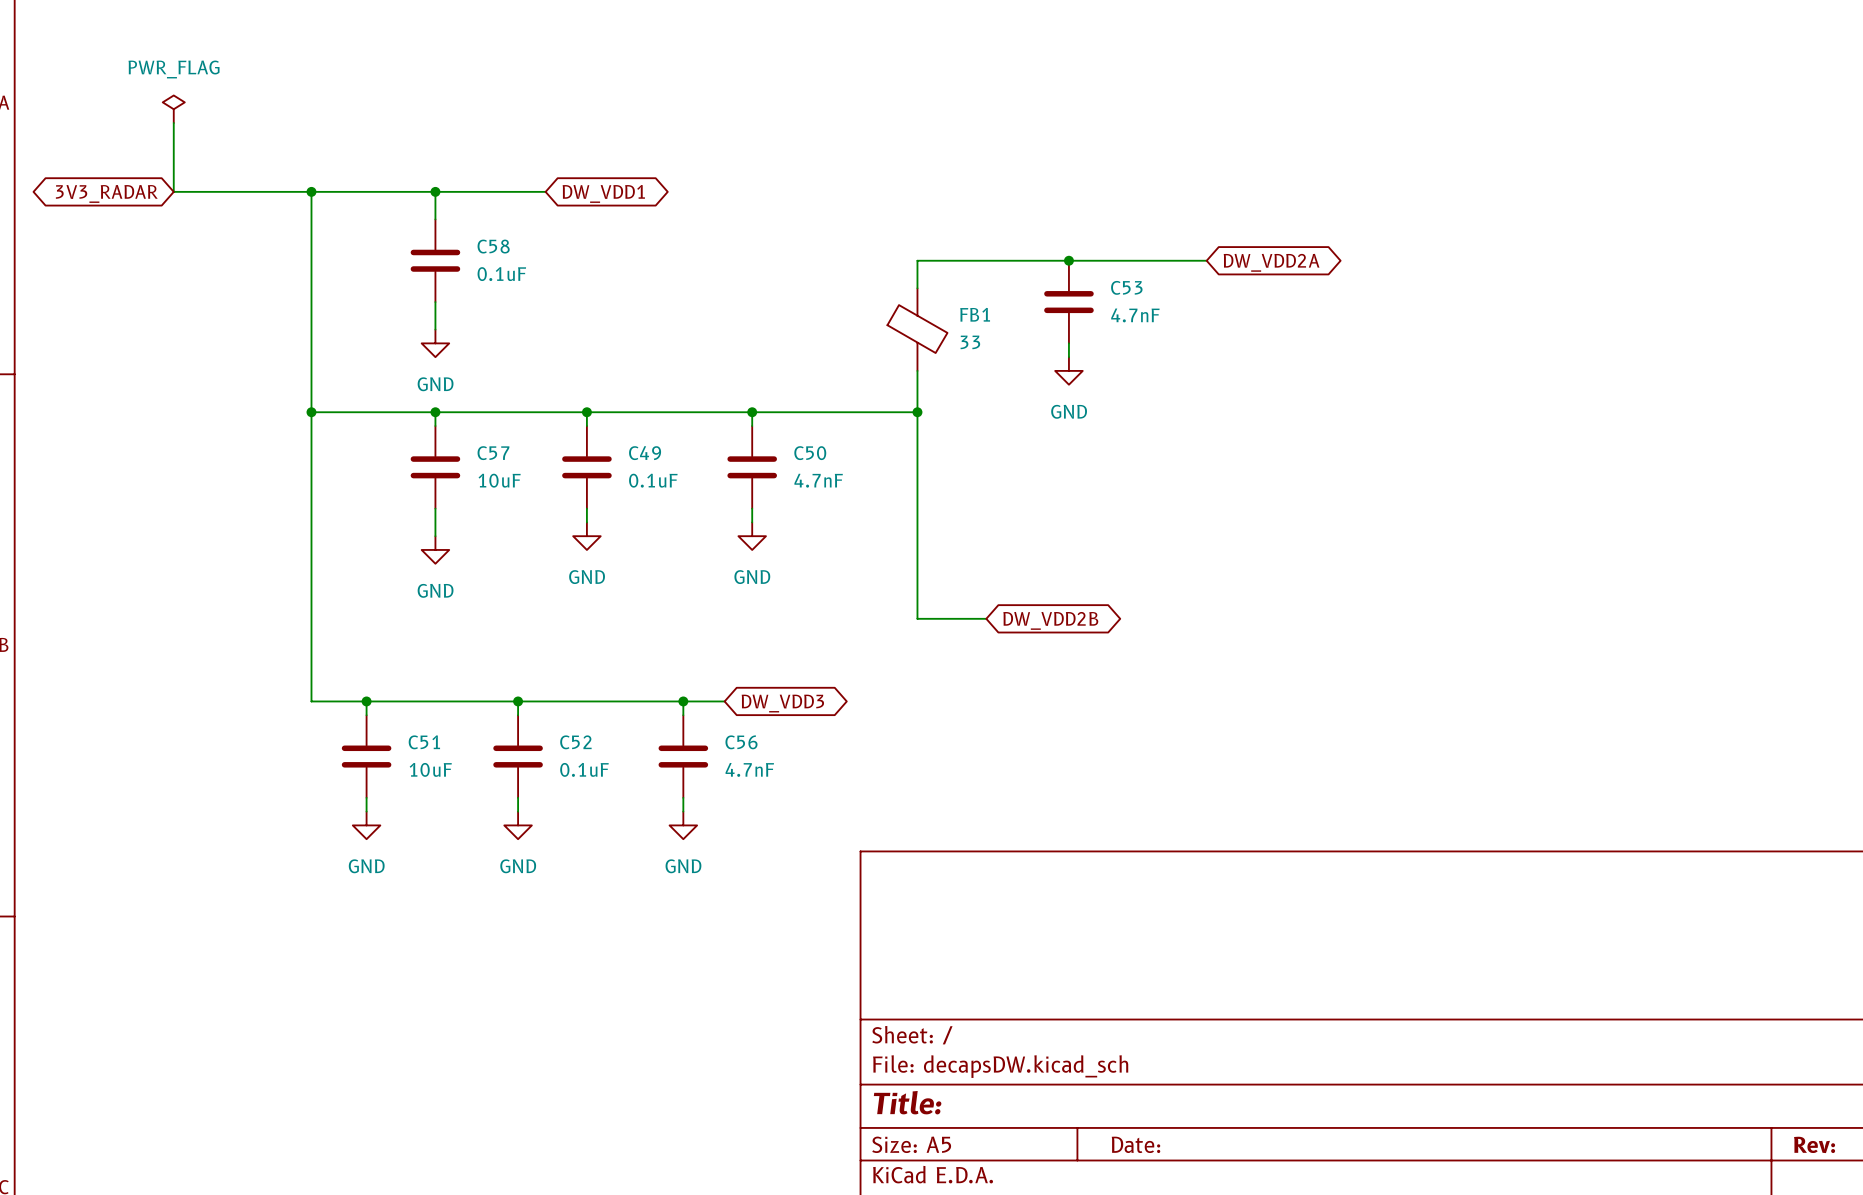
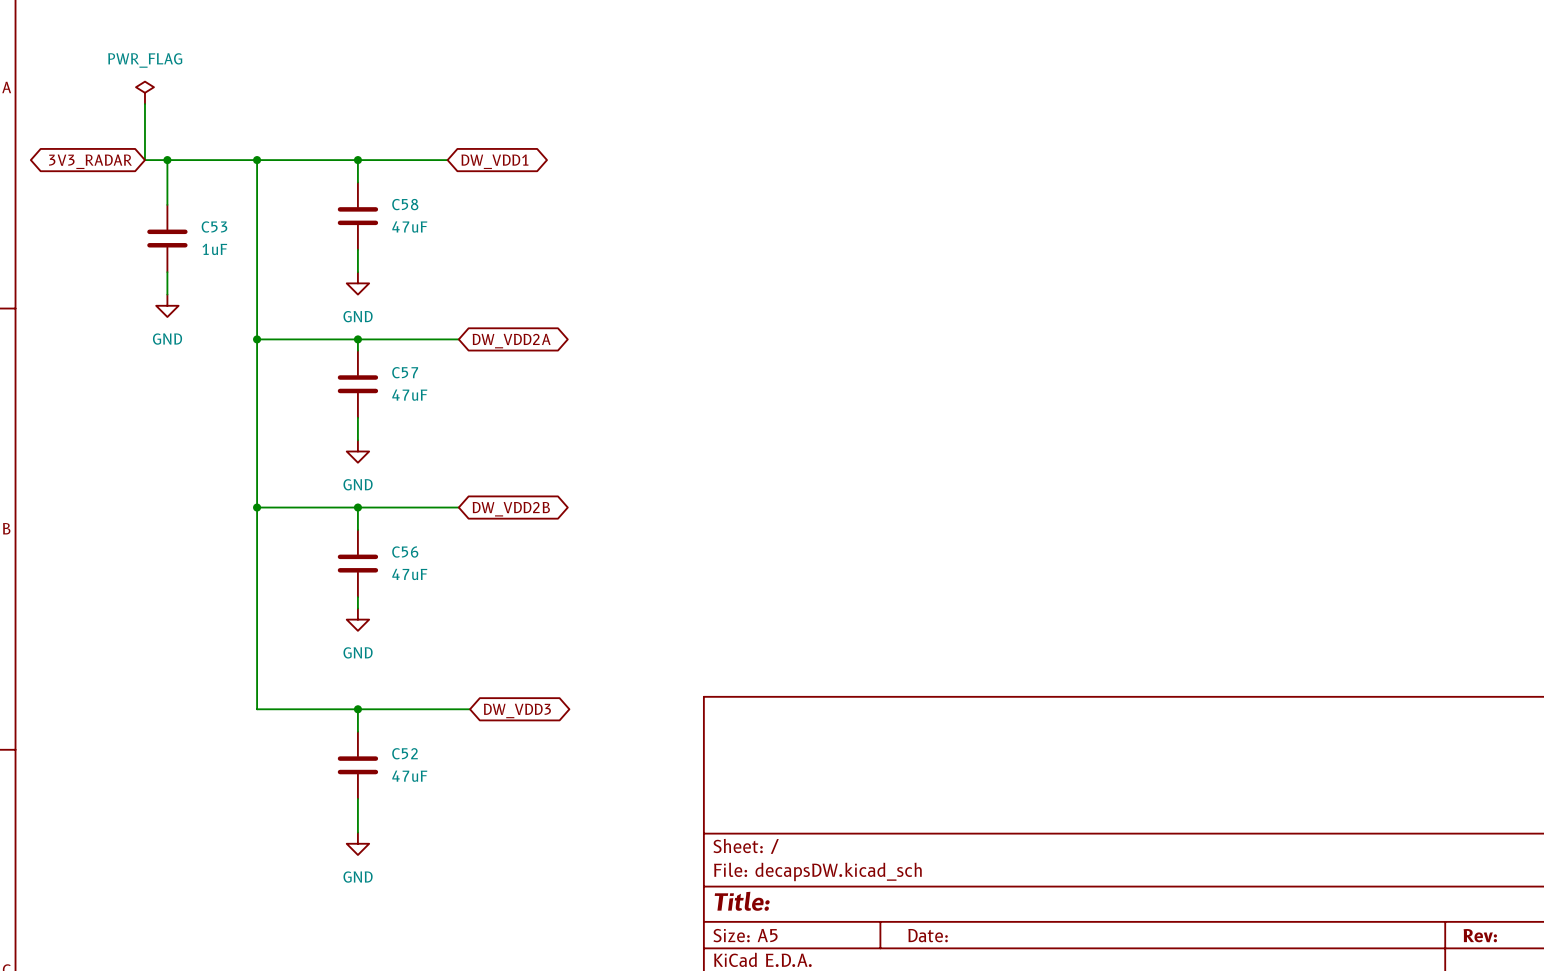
wire: none -> (167, 160) (167, 204)
junction: none -> (167, 160)
junction: (1068, 260) -> none
wire: (1206, 260) (917, 260) (917, 288) -> none
global label: DW_VDD2A (1271, 262) -> none
C58 value: 0.1uF (501, 274) -> 47uF (409, 226)
C53 position: (1068, 302) -> (167, 238)
C53 value: 4.7nF (1135, 315) -> 1uF (214, 249)
wire: none -> (167, 272) (167, 294)
FB1: 33 (917, 329) -> none
wire: (1068, 343) (1068, 357) -> none
power symbol: none -> GND (167, 305)
wire: (917, 370) (917, 618) (986, 618) -> none
power symbol: GND (1068, 370) -> none
wire: (559, 412) (917, 412) -> none
wire: (586, 412) (586, 426) -> none
junction: (586, 412) -> none
wire: (752, 412) (752, 426) -> none
junction: (752, 412) -> none
junction: (917, 412) -> none
global label: none -> DW_VDD2A (511, 341)
C49: 0.1uF (586, 467) -> none
C50: 4.7nF (752, 467) -> none
C57 value: 10uF (499, 480) -> 47uF (409, 395)
wire: (586, 508) (586, 522) -> none
wire: (752, 508) (752, 522) -> none
power symbol: GND (586, 536) -> none
power symbol: GND (752, 536) -> none
wire: none -> (257, 507) (458, 507)
junction: none -> (257, 507)
wire: none -> (357, 507) (357, 529)
junction: none -> (357, 507)
global label: none -> DW_VDD2B (511, 509)
global label: DW_VDD2B (1050, 620) -> none
wire: (311, 701) (724, 701) -> (257, 574) (257, 709) (470, 709)
wire: (366, 701) (366, 715) -> (357, 597) (357, 608)
junction: (366, 701) -> none
wire: (518, 701) (518, 715) -> none
junction: (518, 701) -> none
wire: (683, 701) (683, 715) -> none
junction: (683, 701) -> none
global label position: DW_VDD3 (782, 703) -> DW_VDD3 (517, 710)
C51: 10uF (366, 756) -> none
power symbol: none -> GND (357, 619)
C52 position: (518, 756) -> (357, 765)
C56 position: (683, 756) -> (357, 563)
C52 value: 0.1uF (584, 769) -> 47uF (409, 776)
C56 value: 4.7nF (749, 769) -> 47uF (409, 574)
wire: (366, 797) (366, 811) -> none
wire: (518, 797) (518, 811) -> none
wire: (683, 797) (683, 811) -> none
power symbol: GND (366, 825) -> none
power symbol: GND (518, 825) -> none
power symbol: GND (683, 825) -> none
wire: none -> (357, 709) (357, 731)
junction: none -> (357, 709)
wire: none -> (357, 798) (357, 832)
power symbol: none -> GND (357, 843)

